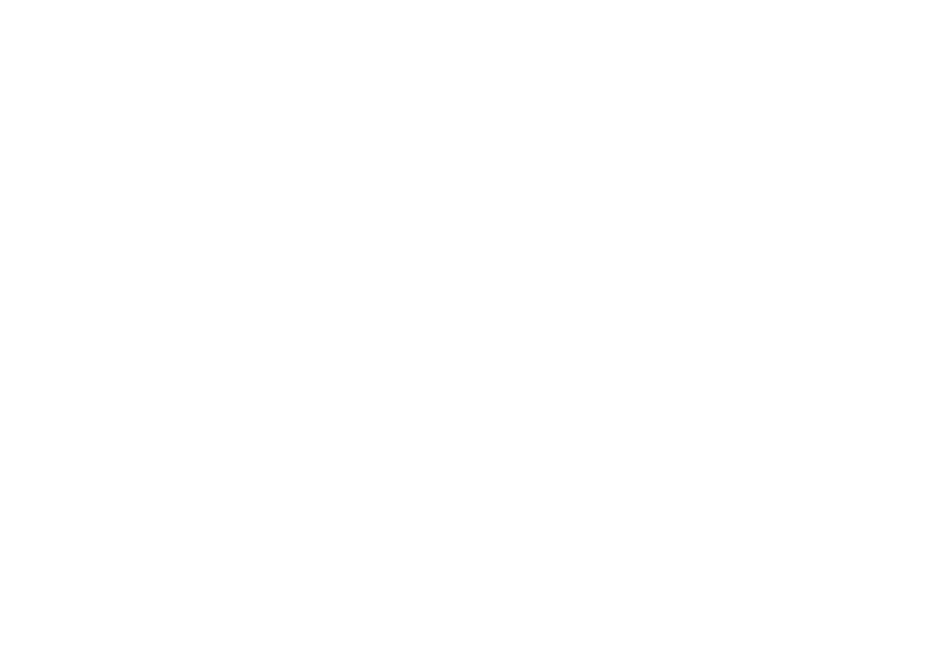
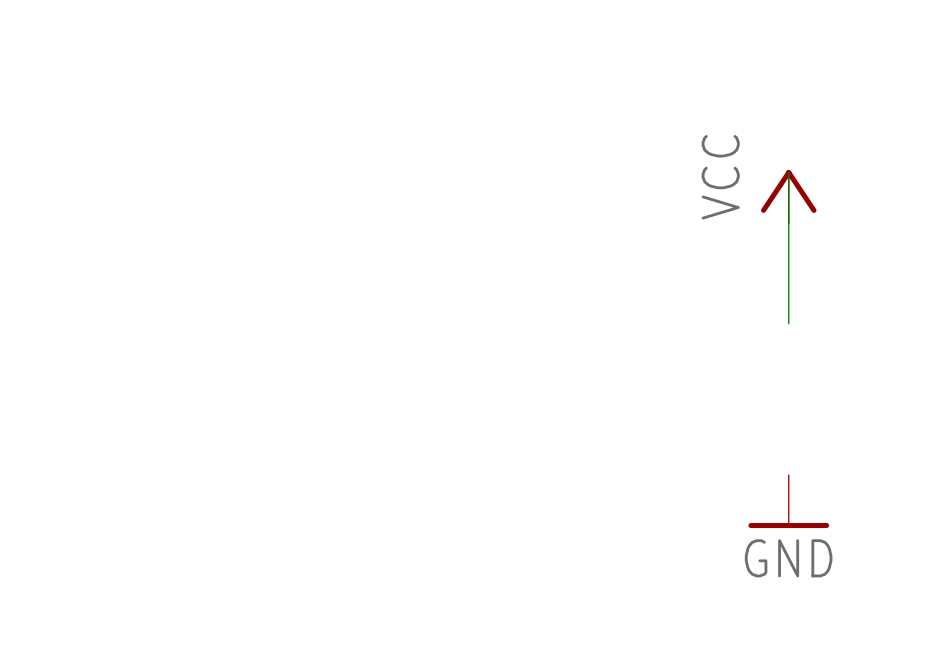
wire: none -> (788, 172) (788, 323)
power symbol: none -> VCC (788, 196)
power symbol: none -> GND (788, 501)

